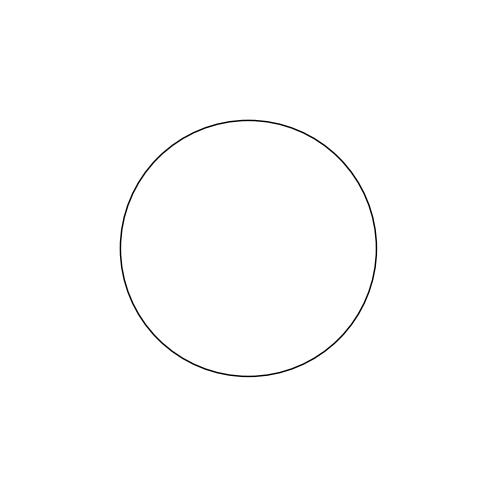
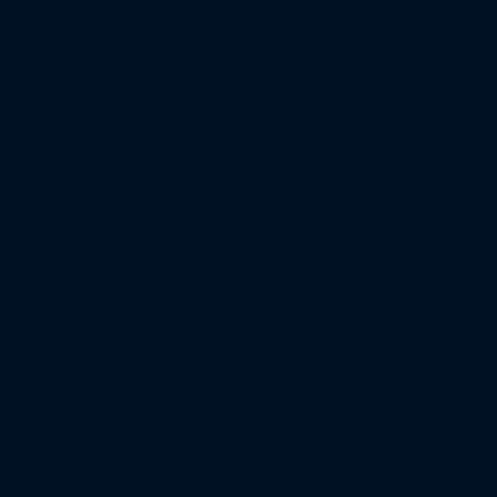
round board edge: [119, 119, 378, 378] -> none

